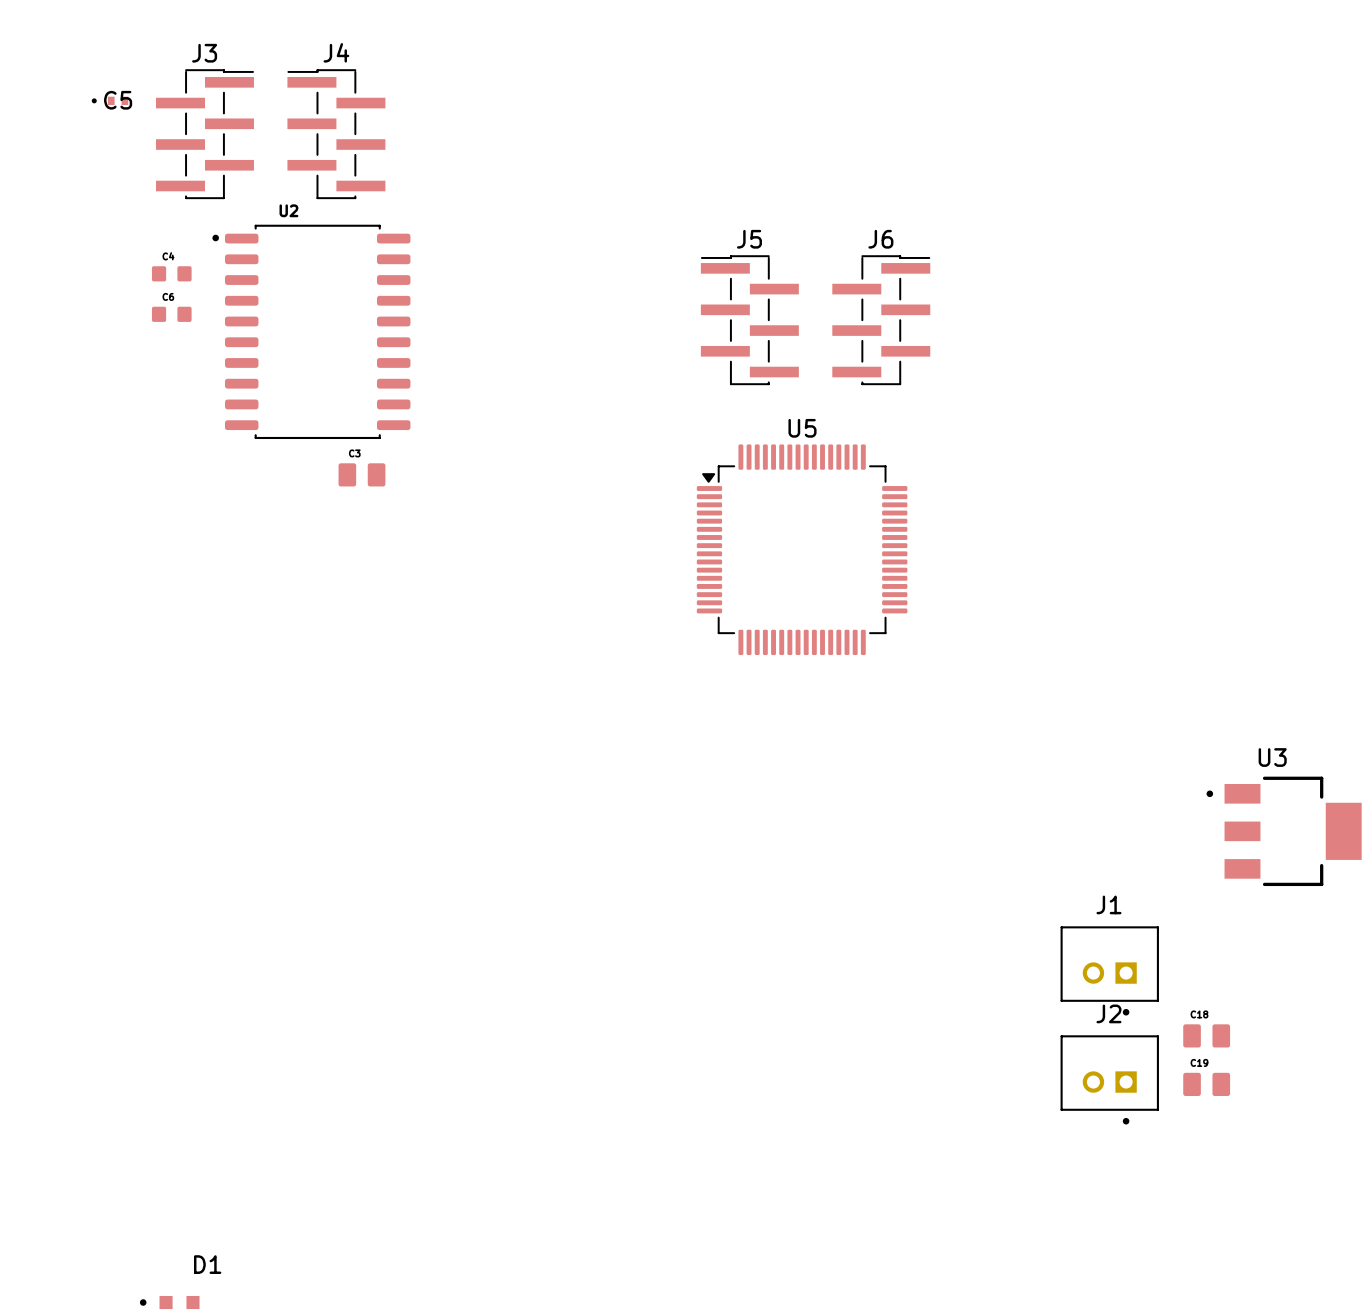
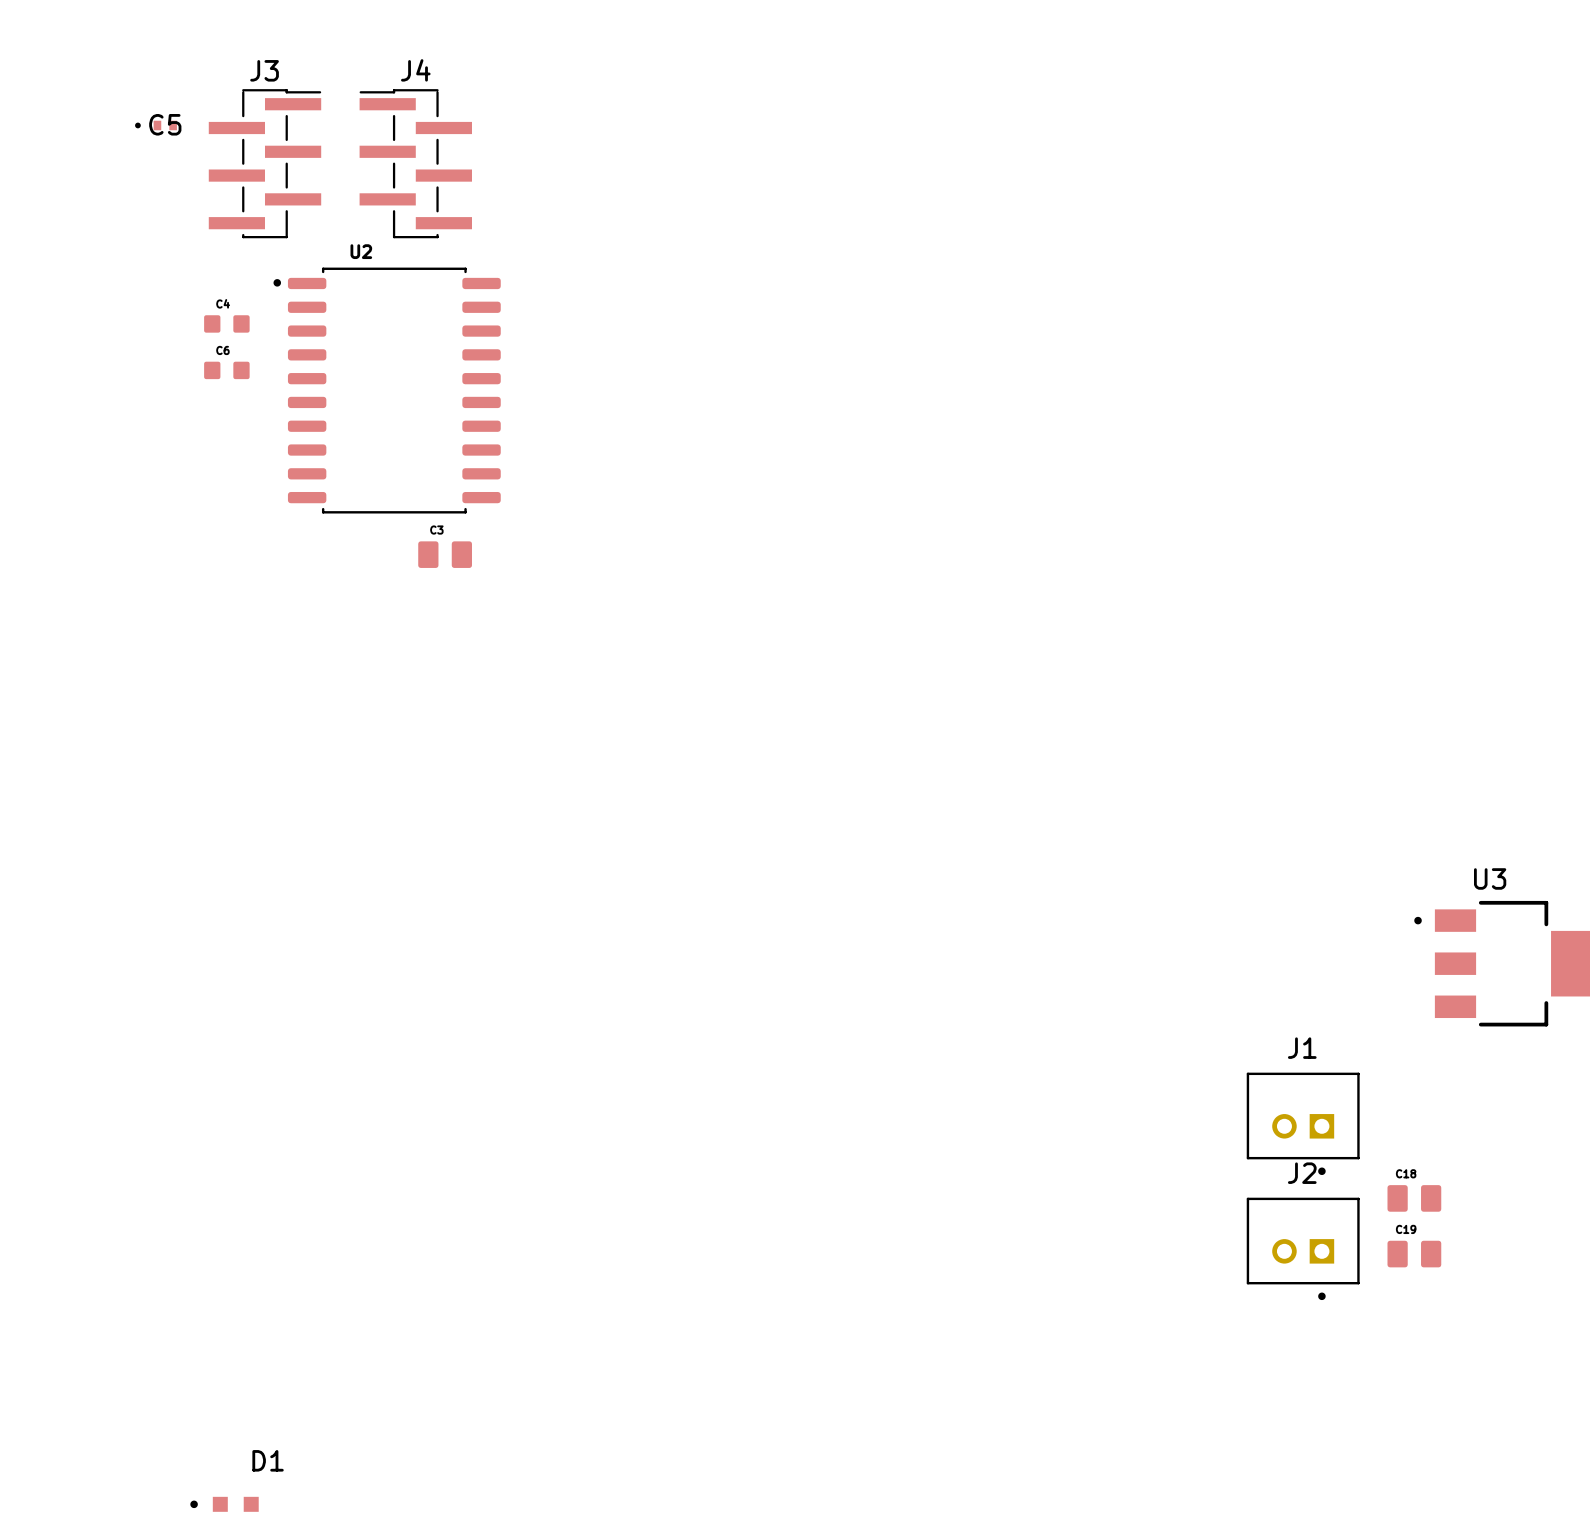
J5: (749, 320) -> none
J6: (881, 320) -> none
U5: (802, 549) -> none

